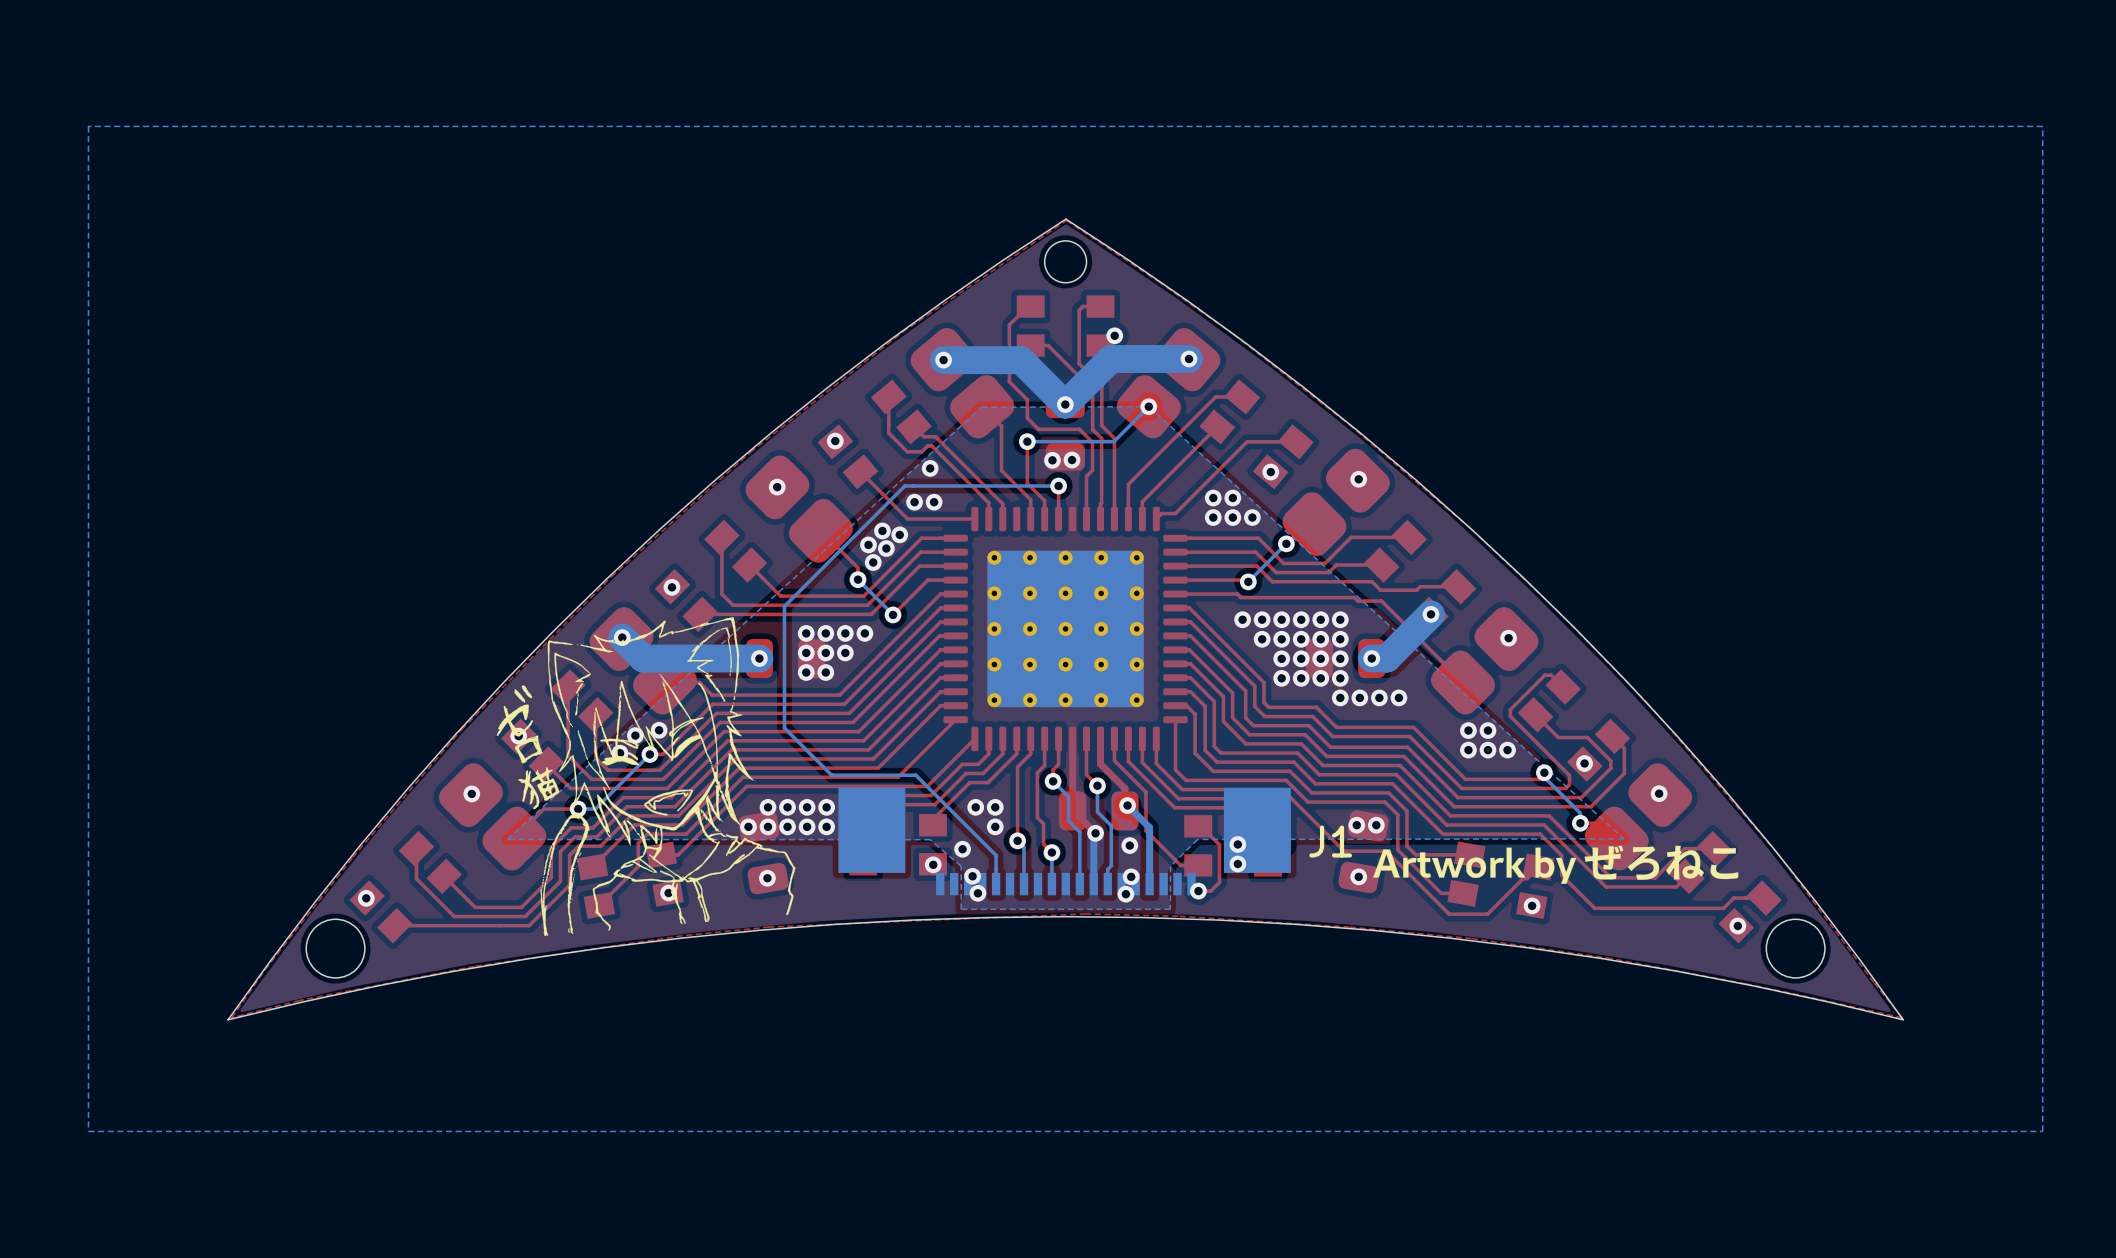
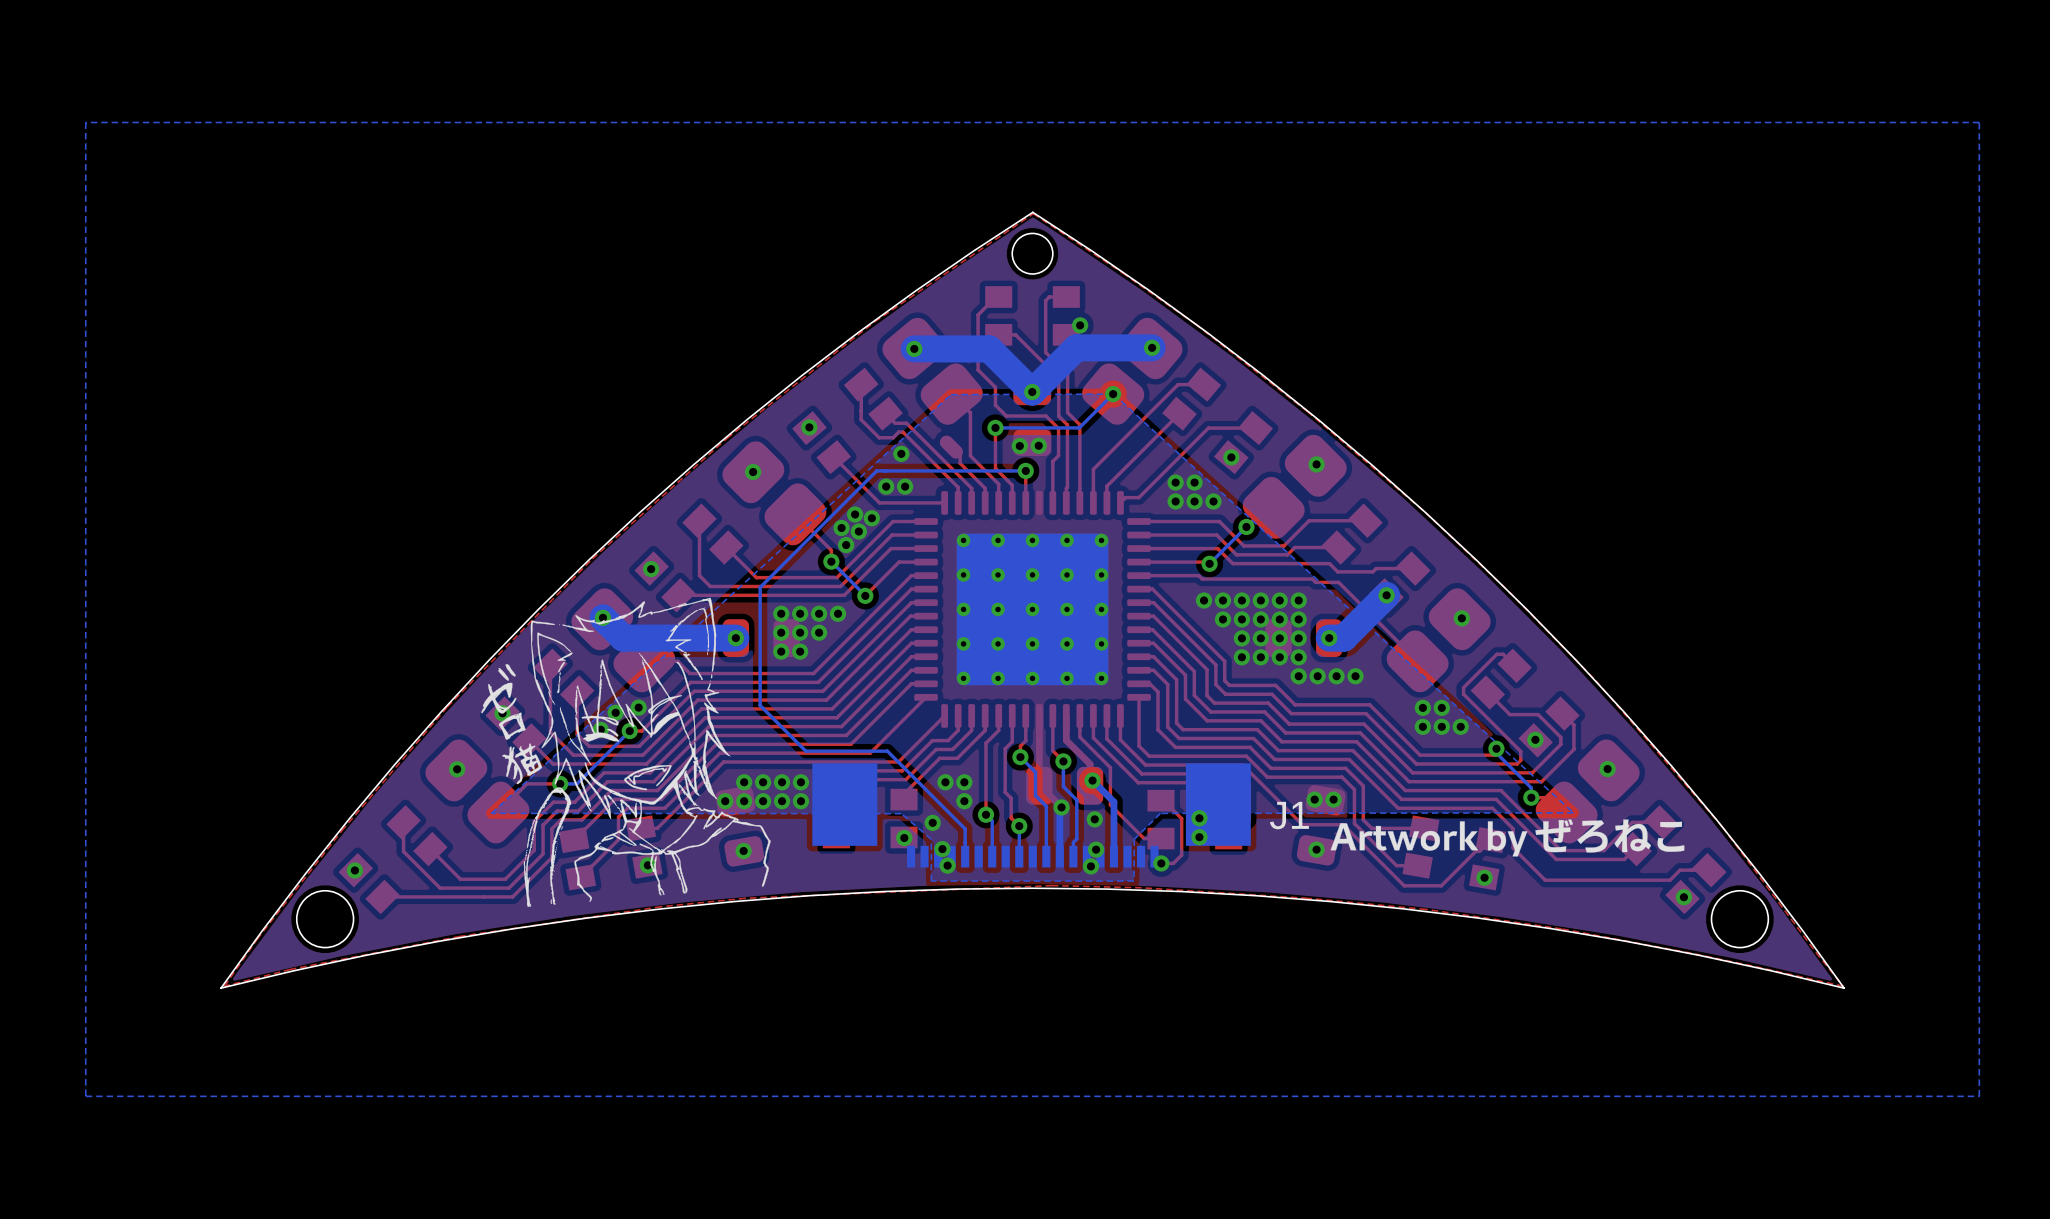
top track: none -> (951, 447) (960, 455) (960, 463) (985, 488) (985, 502)
part: none -> (951, 447)

